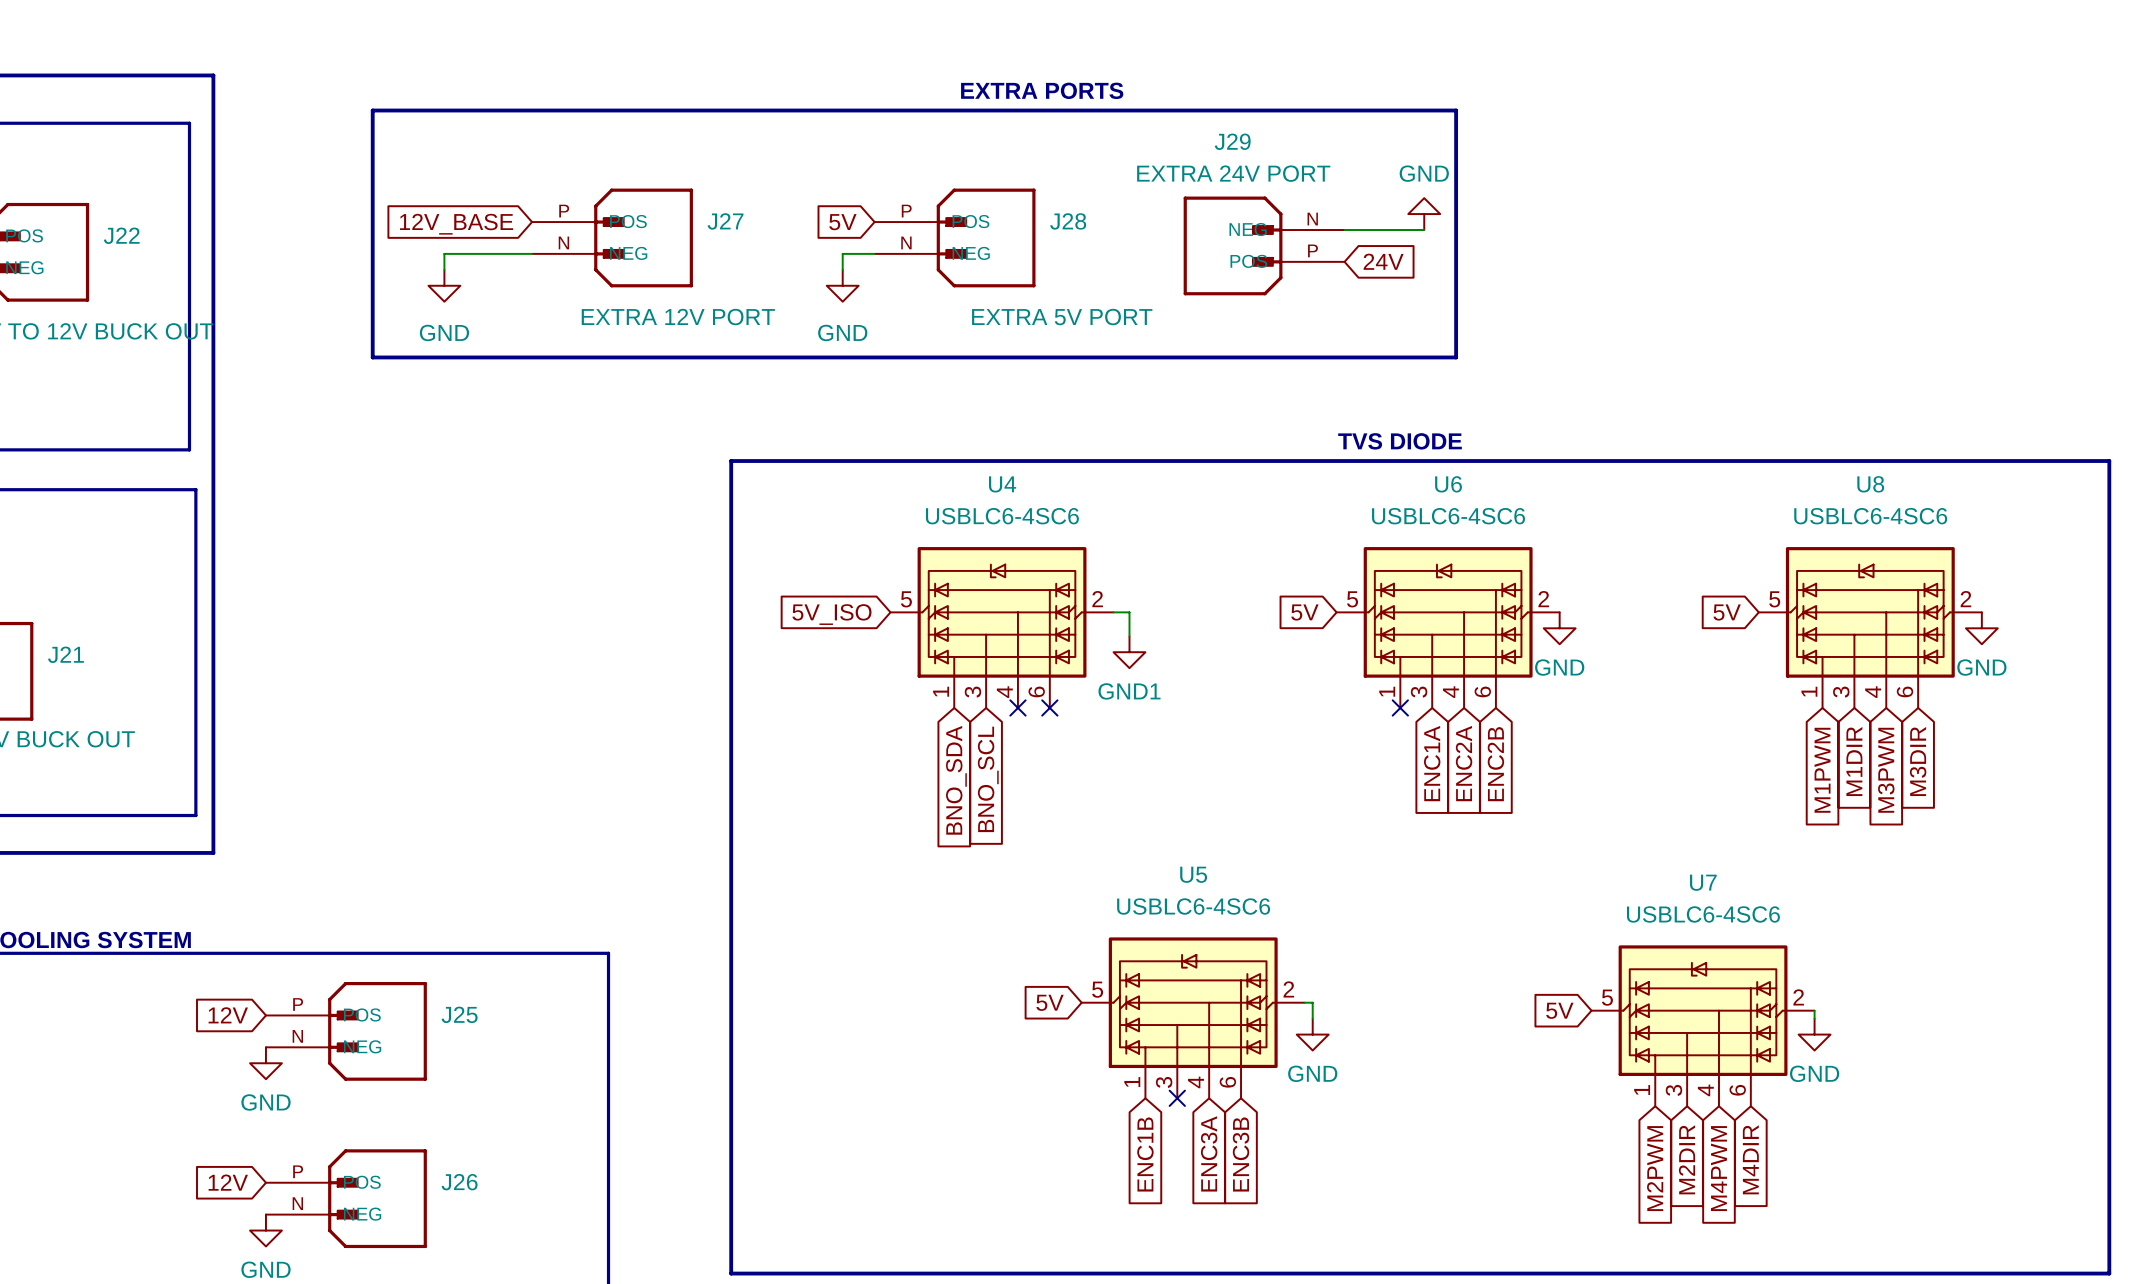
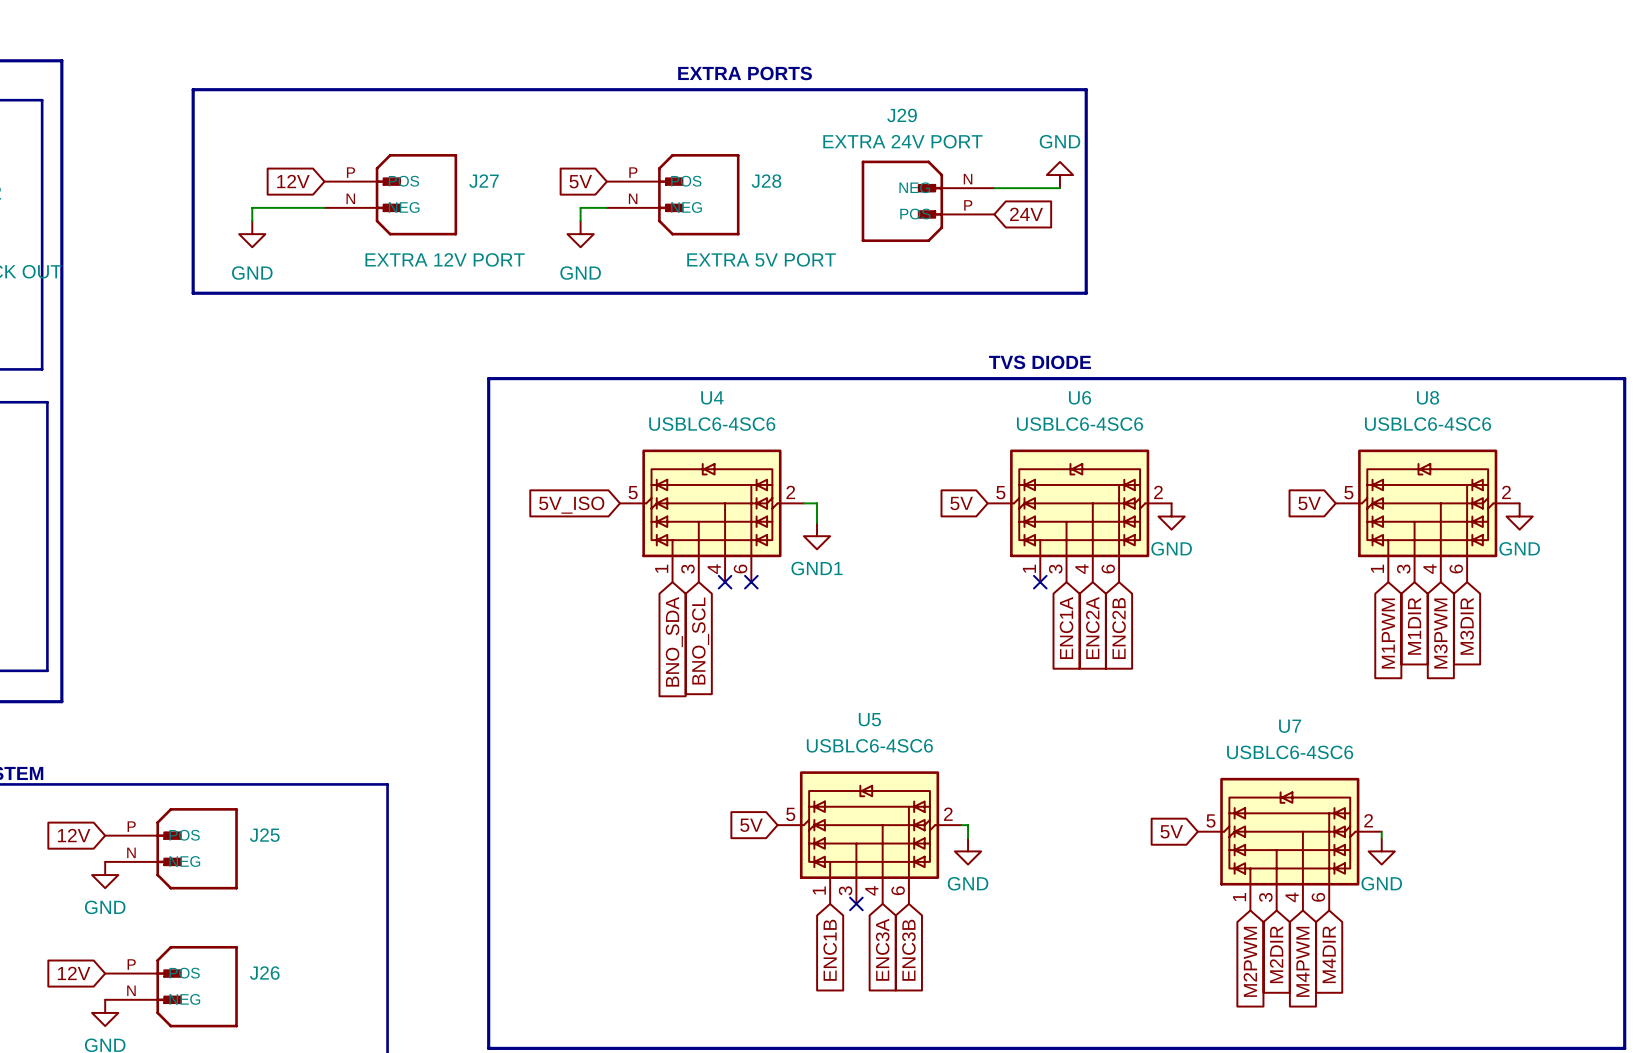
global label: 12V_BASE (456, 224) -> 12V (293, 181)

